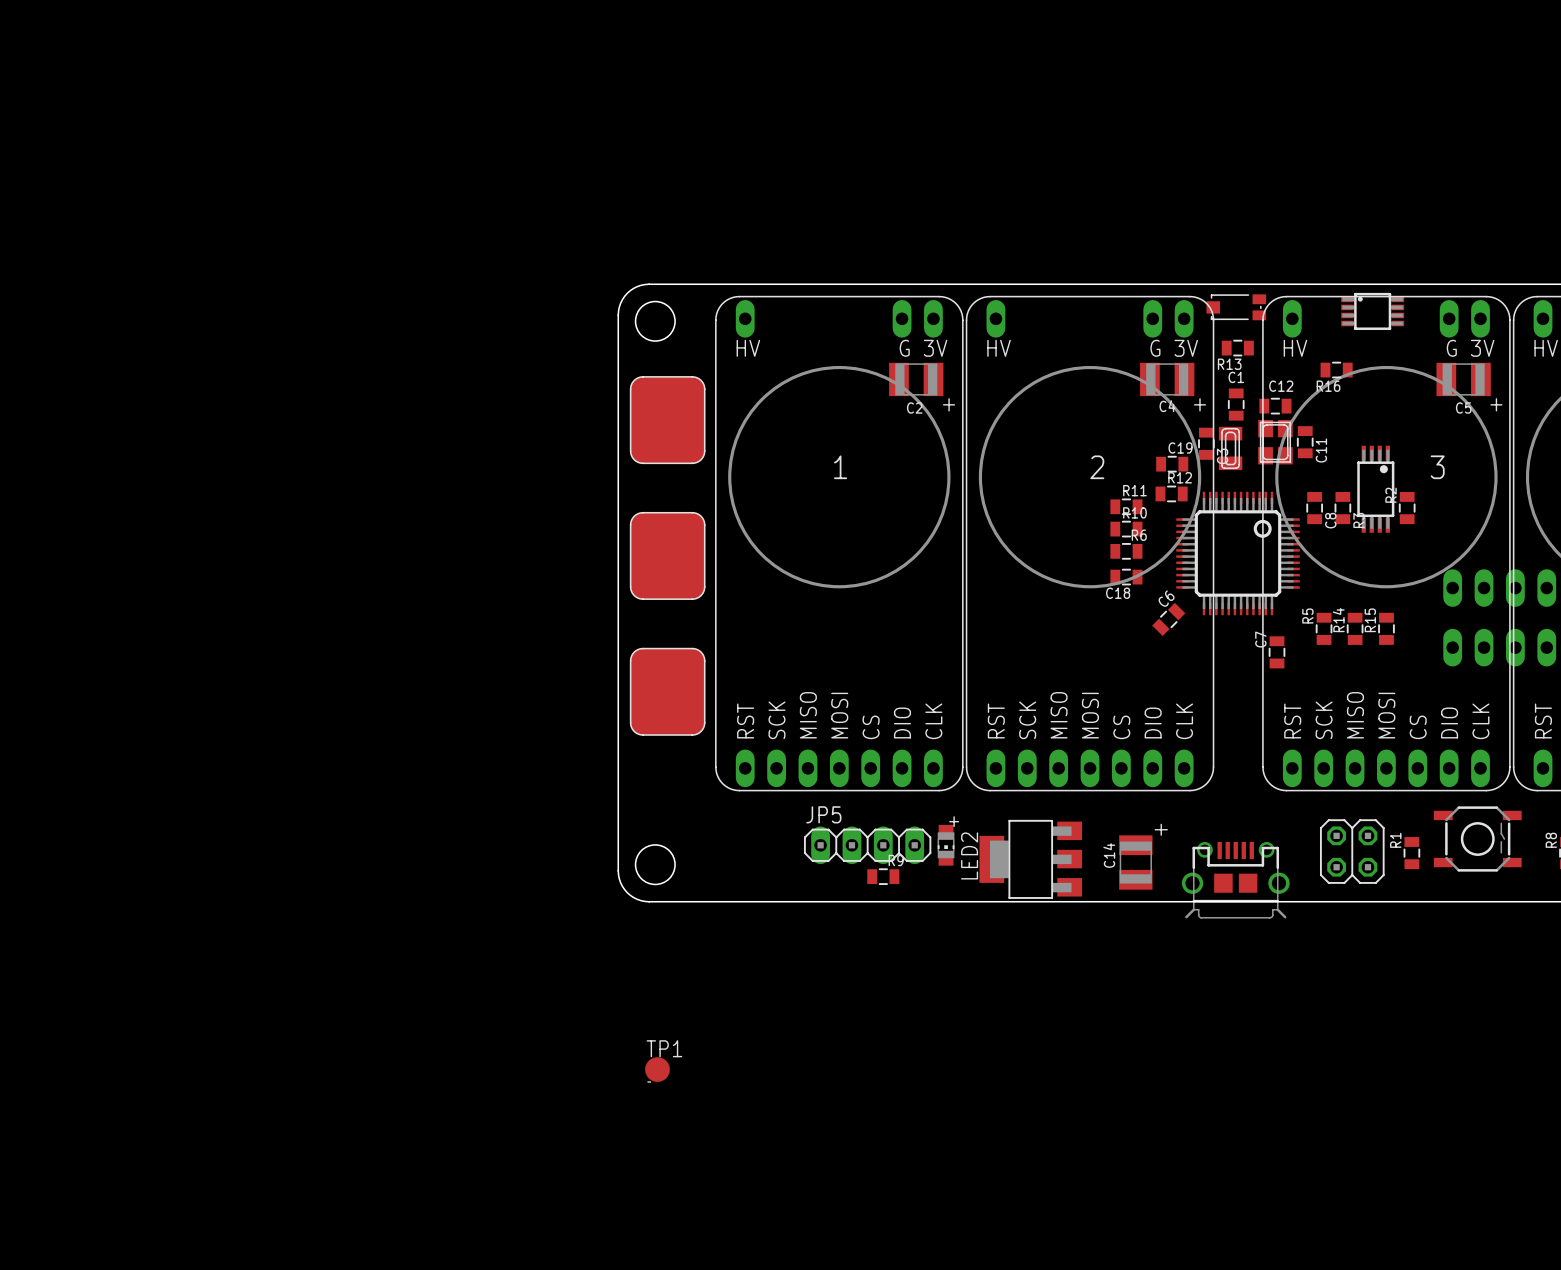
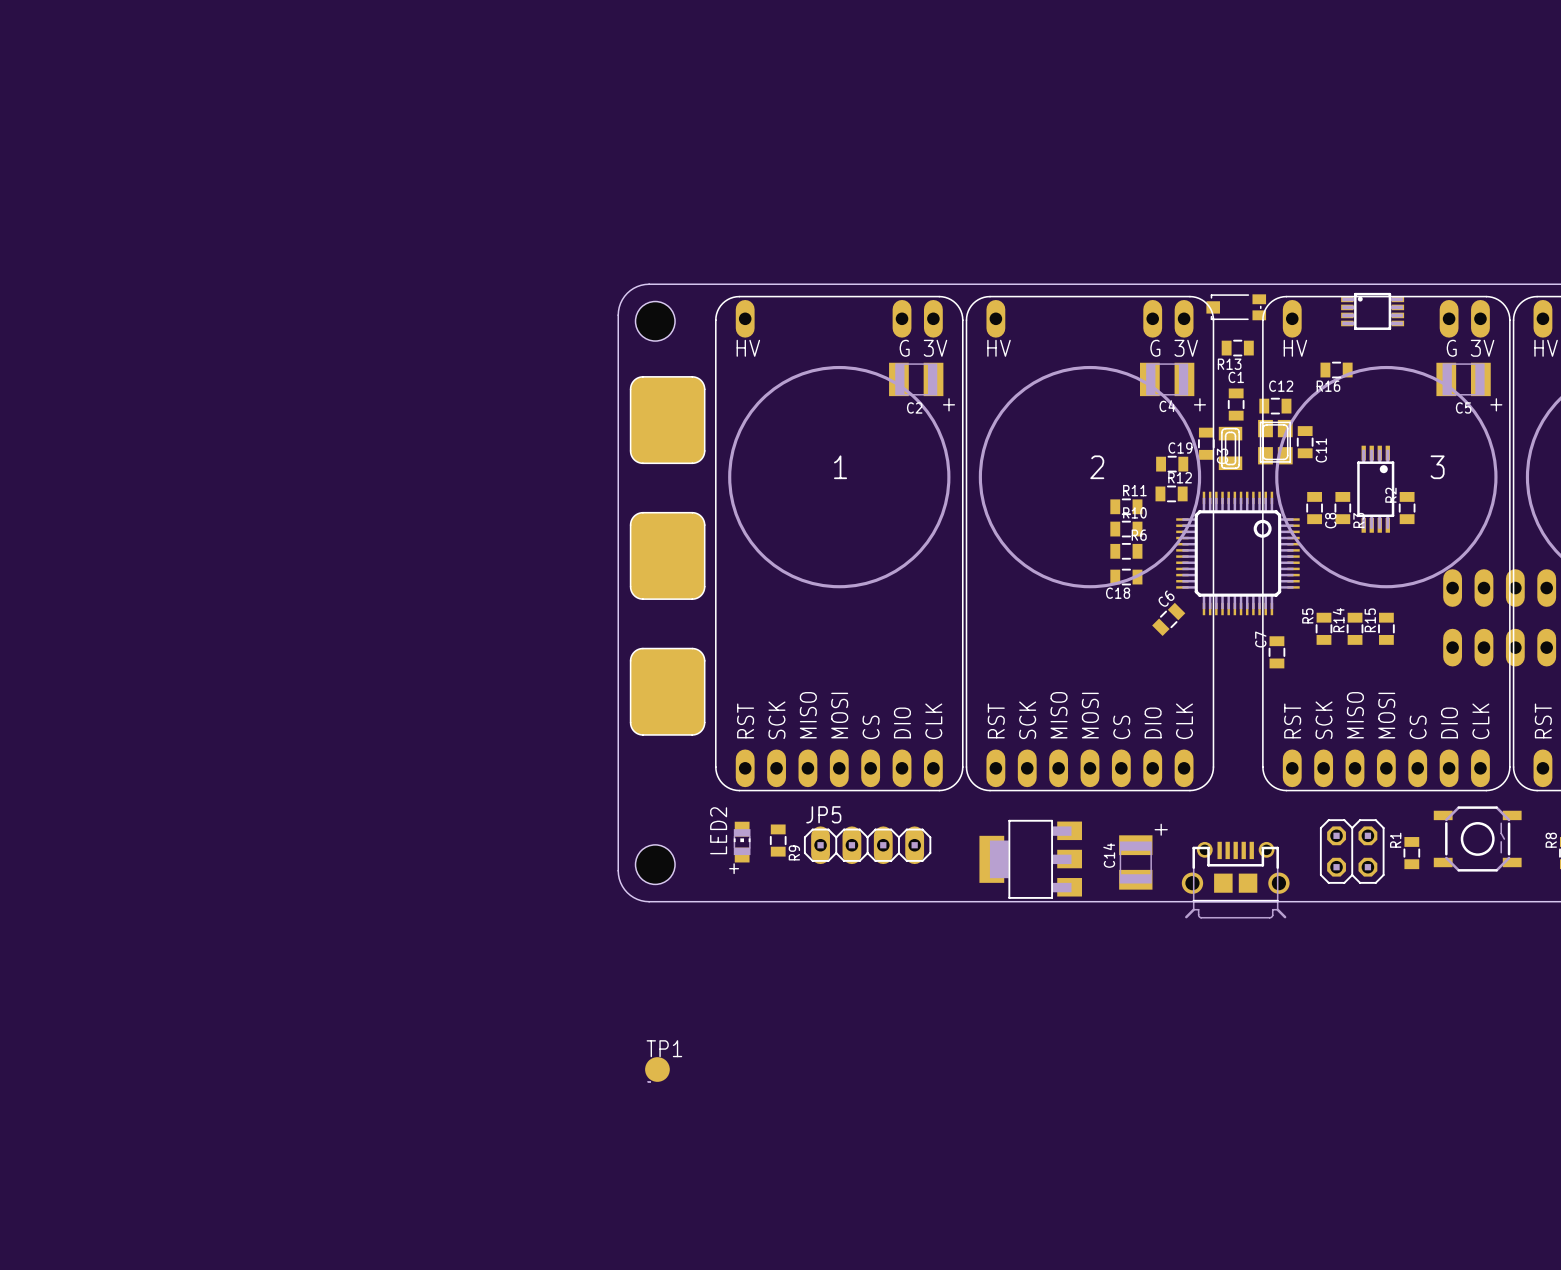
LED2 footprint: [937, 824, 955, 866] -> [733, 821, 751, 863]
LED2 name position: LED2 (969, 855) -> LED2 (718, 830)
R9 rotation: 0° (883, 876) -> 90° clockwise (778, 840)
R9 position: (883, 876) -> (778, 840)

